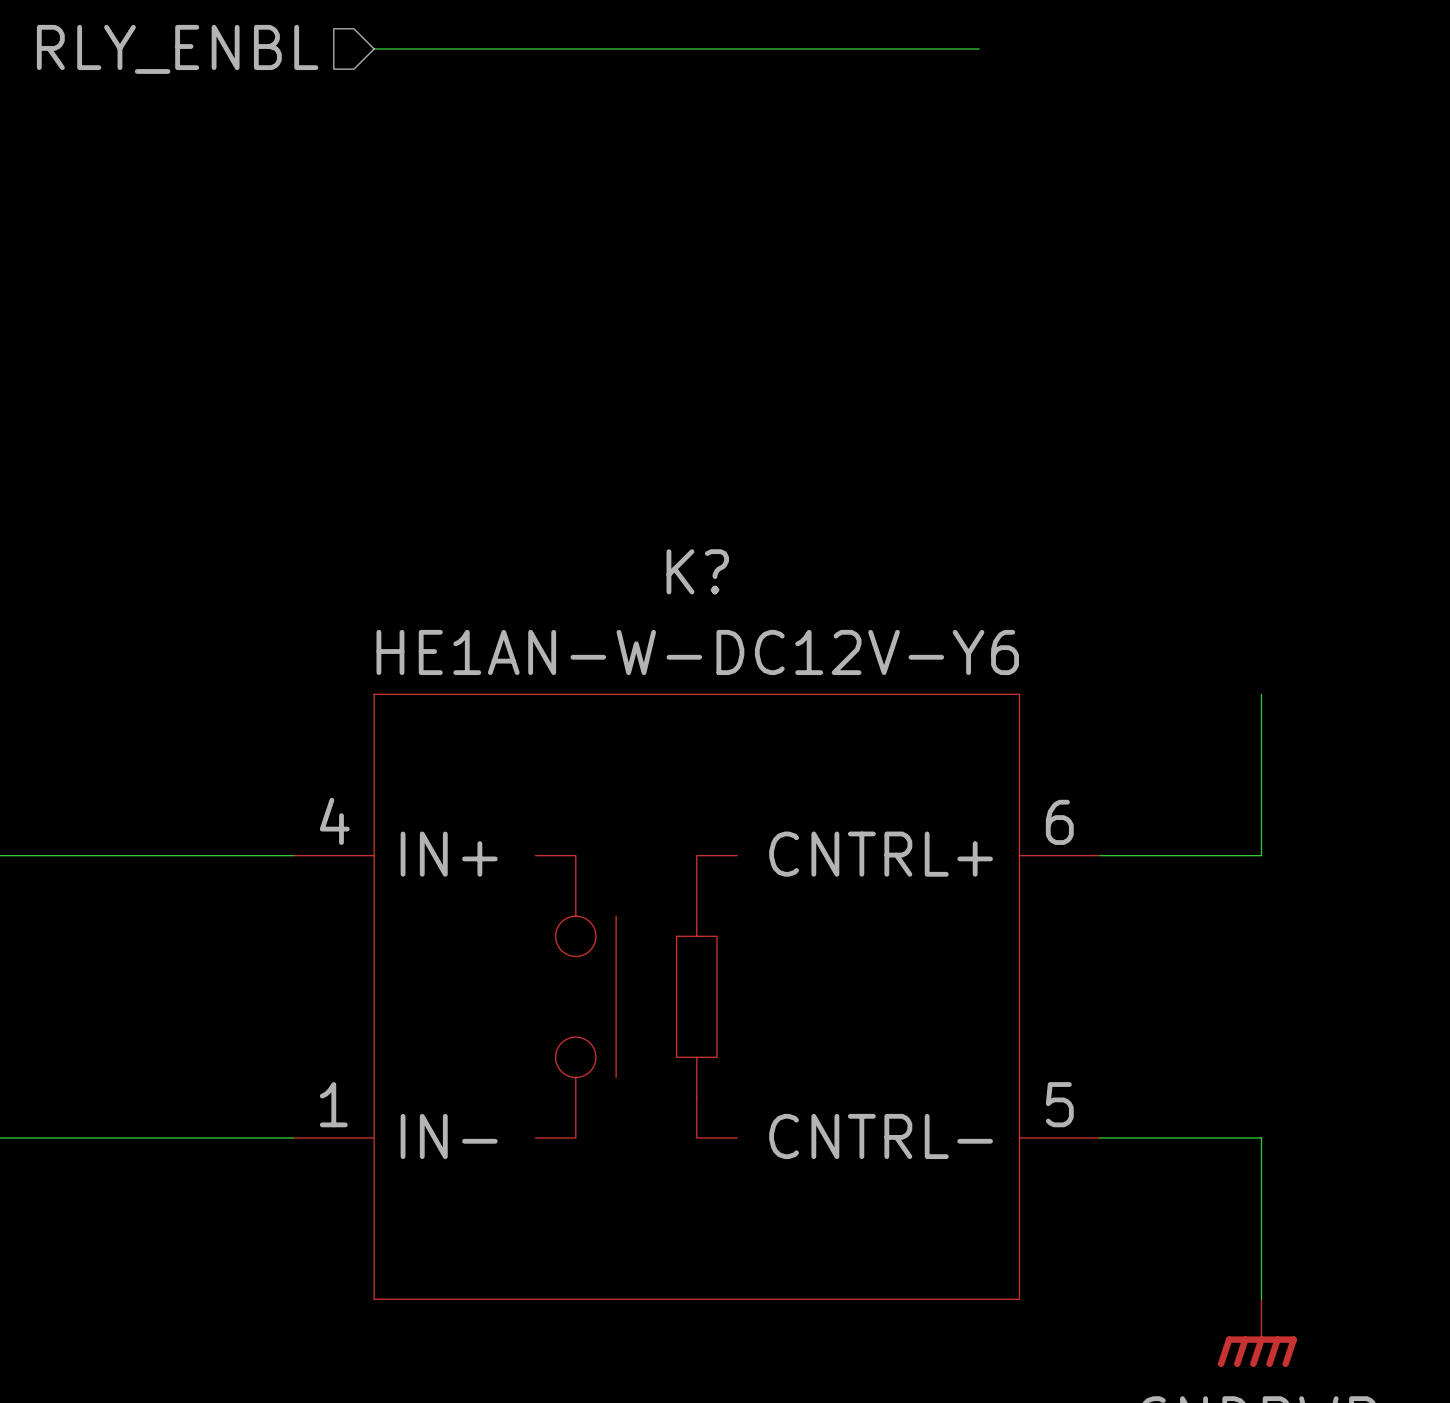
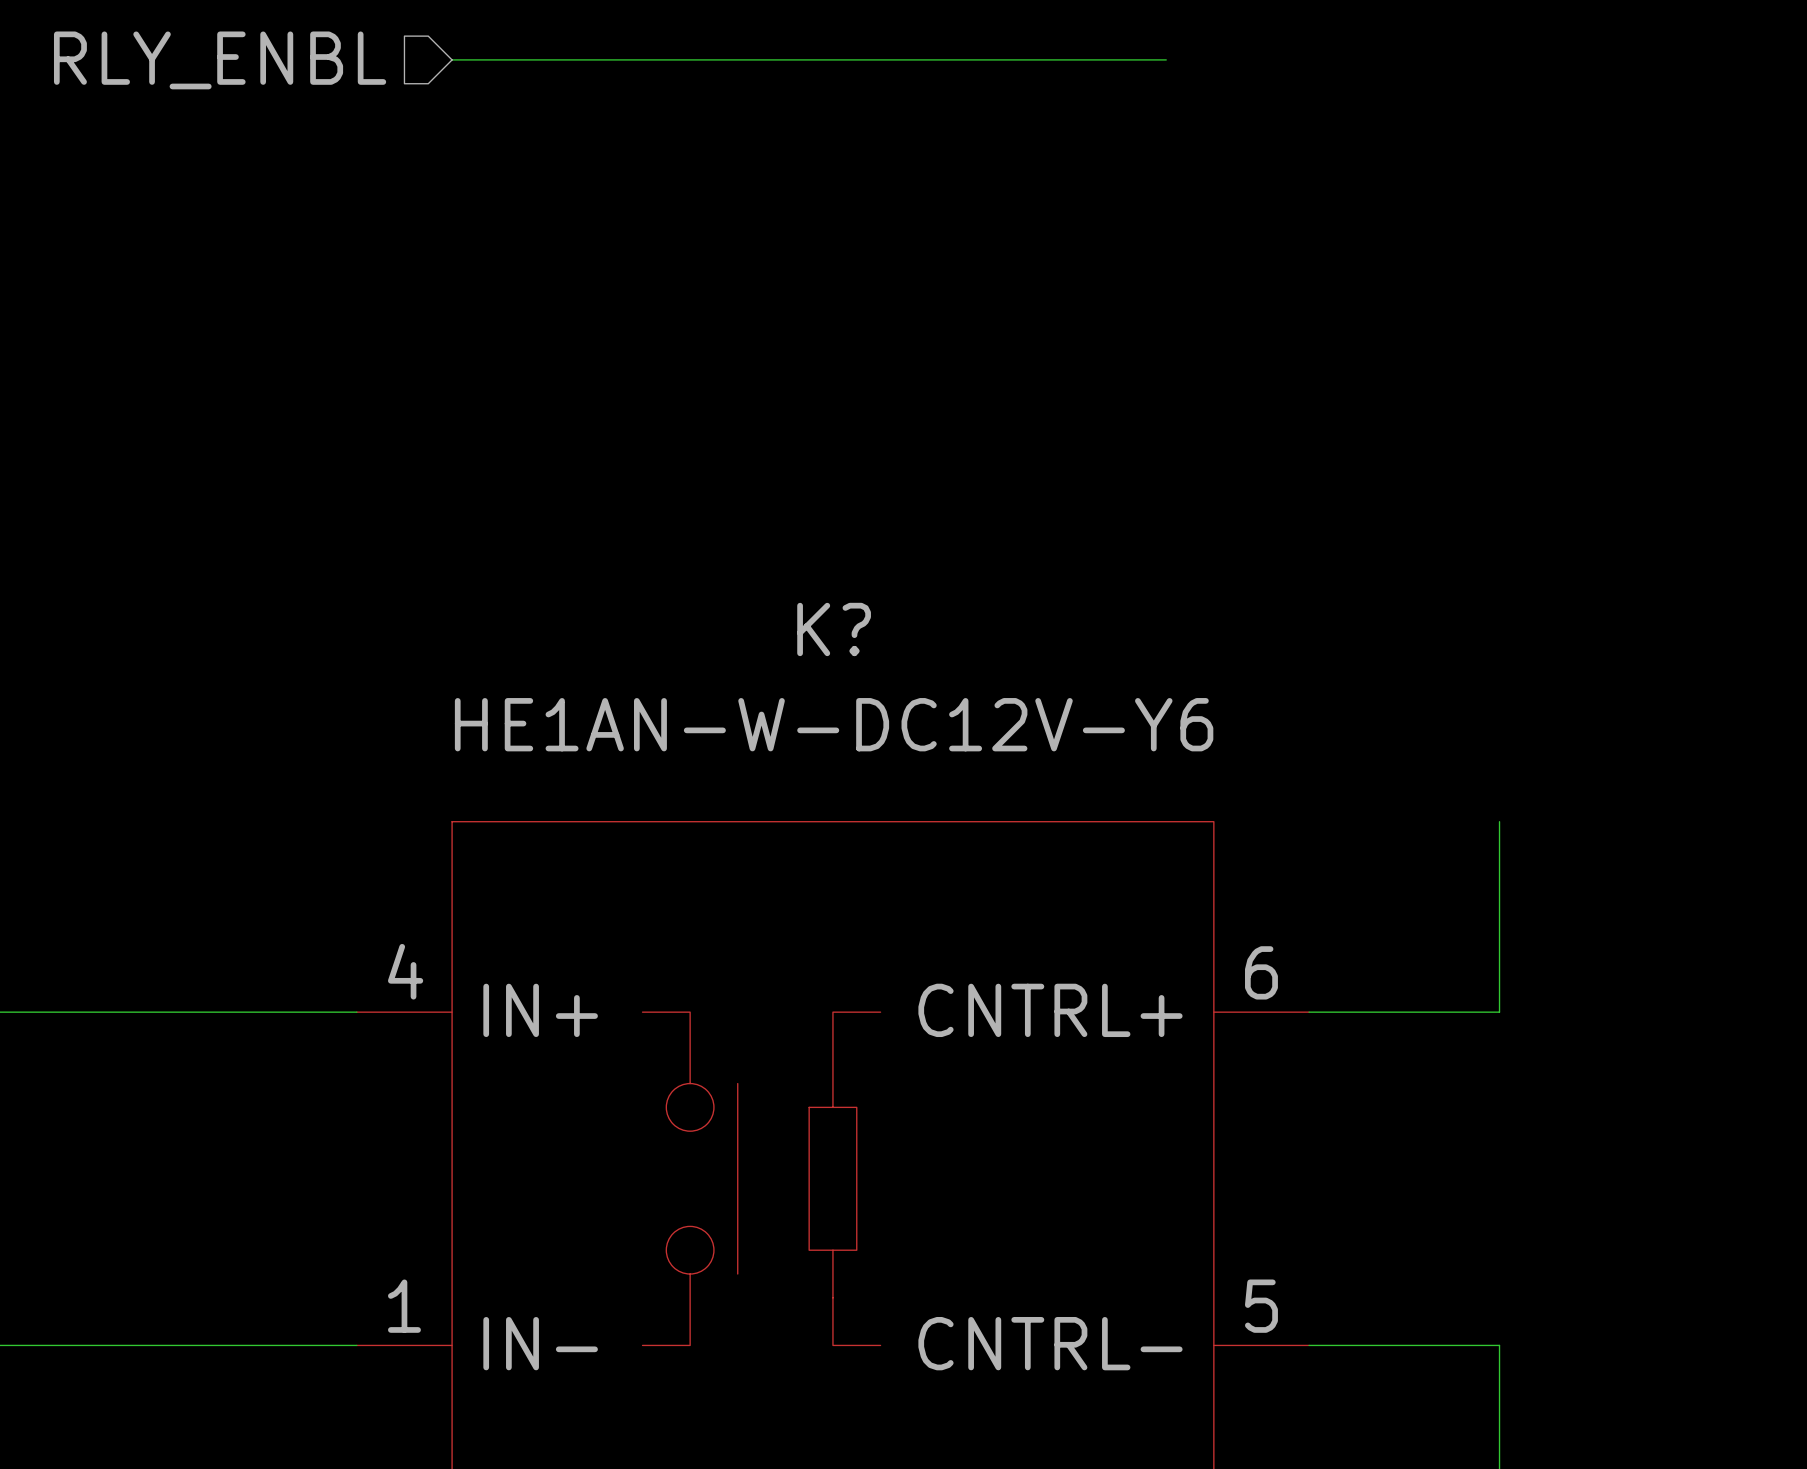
K? name position: K? (697, 571) -> K? (834, 629)
K? value position: HE1AN-W-DC12V-Y6 (697, 652) -> HE1AN-W-DC12V-Y6 (834, 724)

